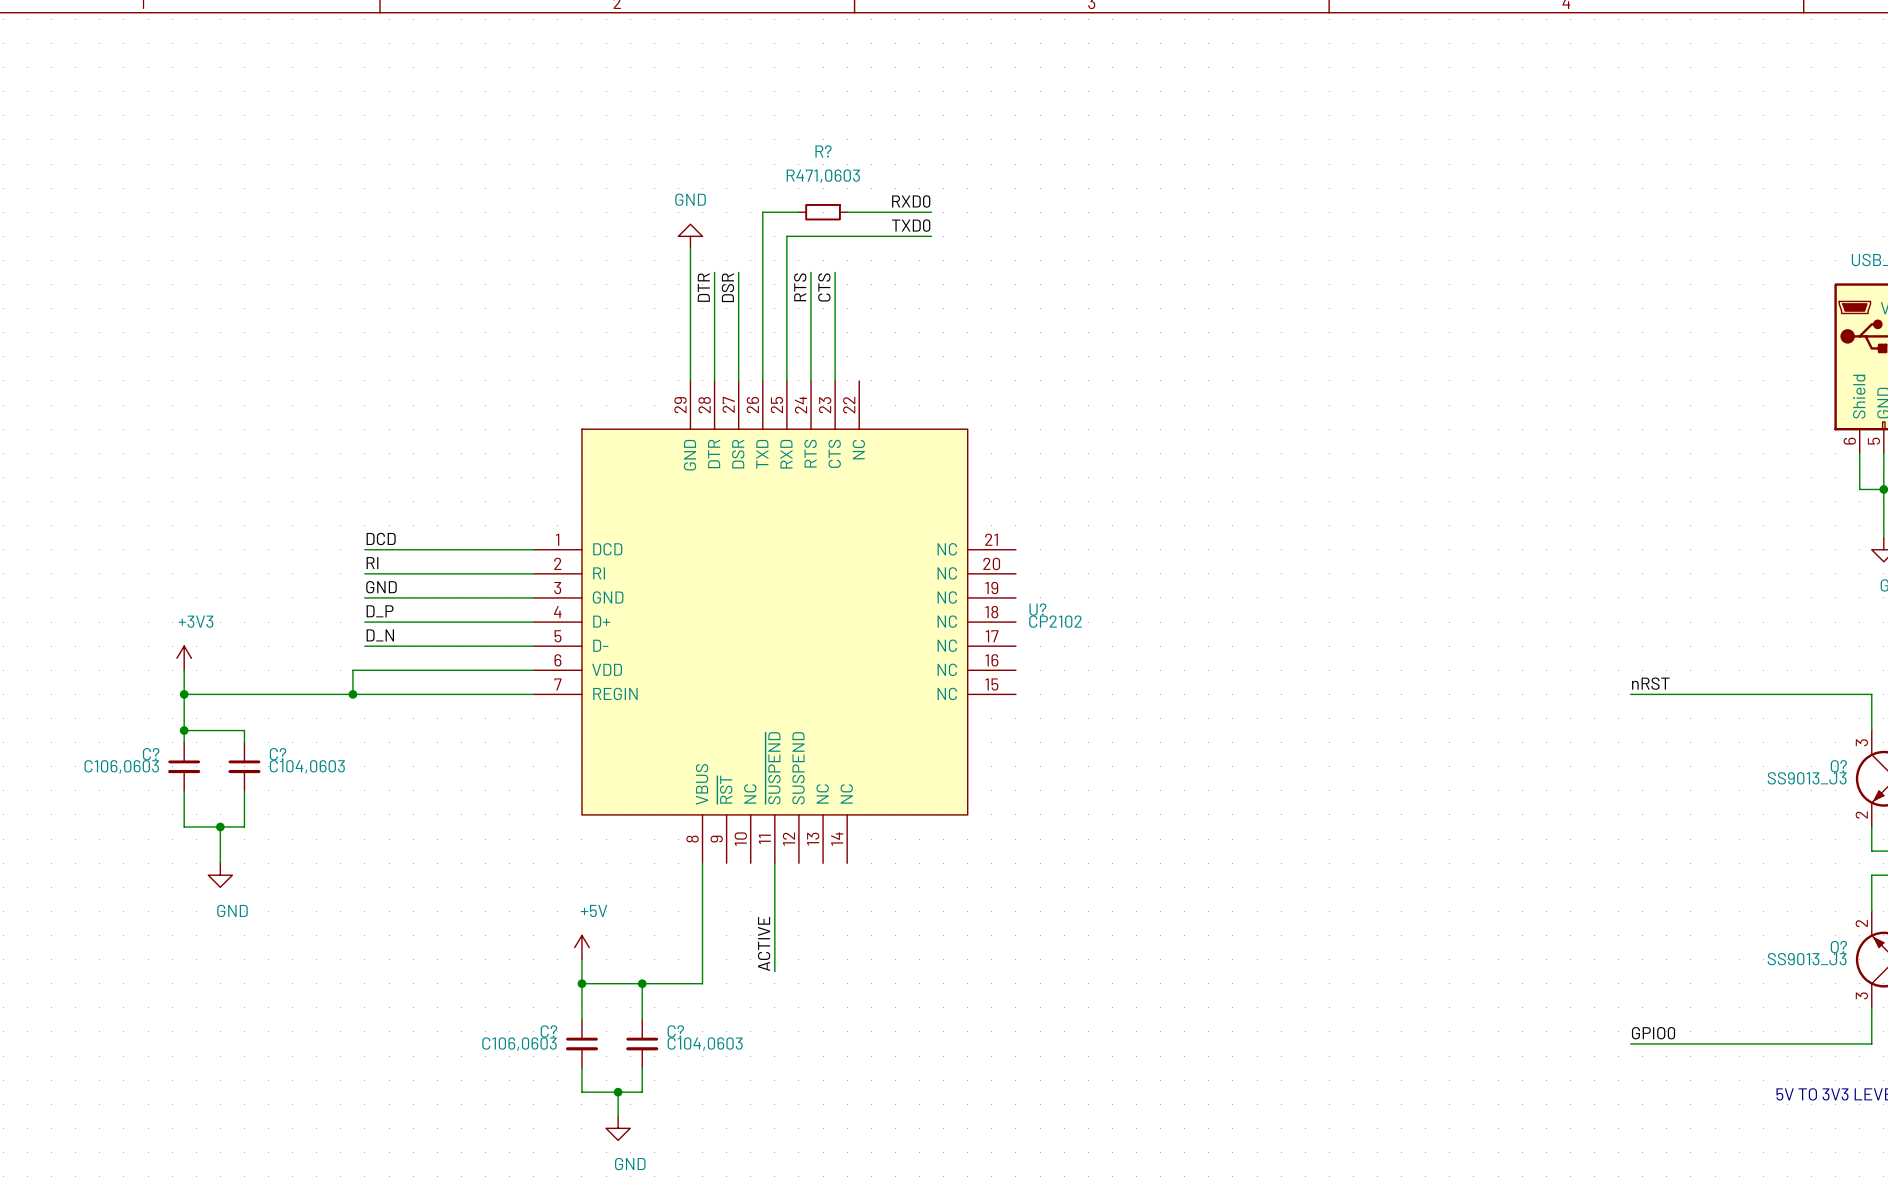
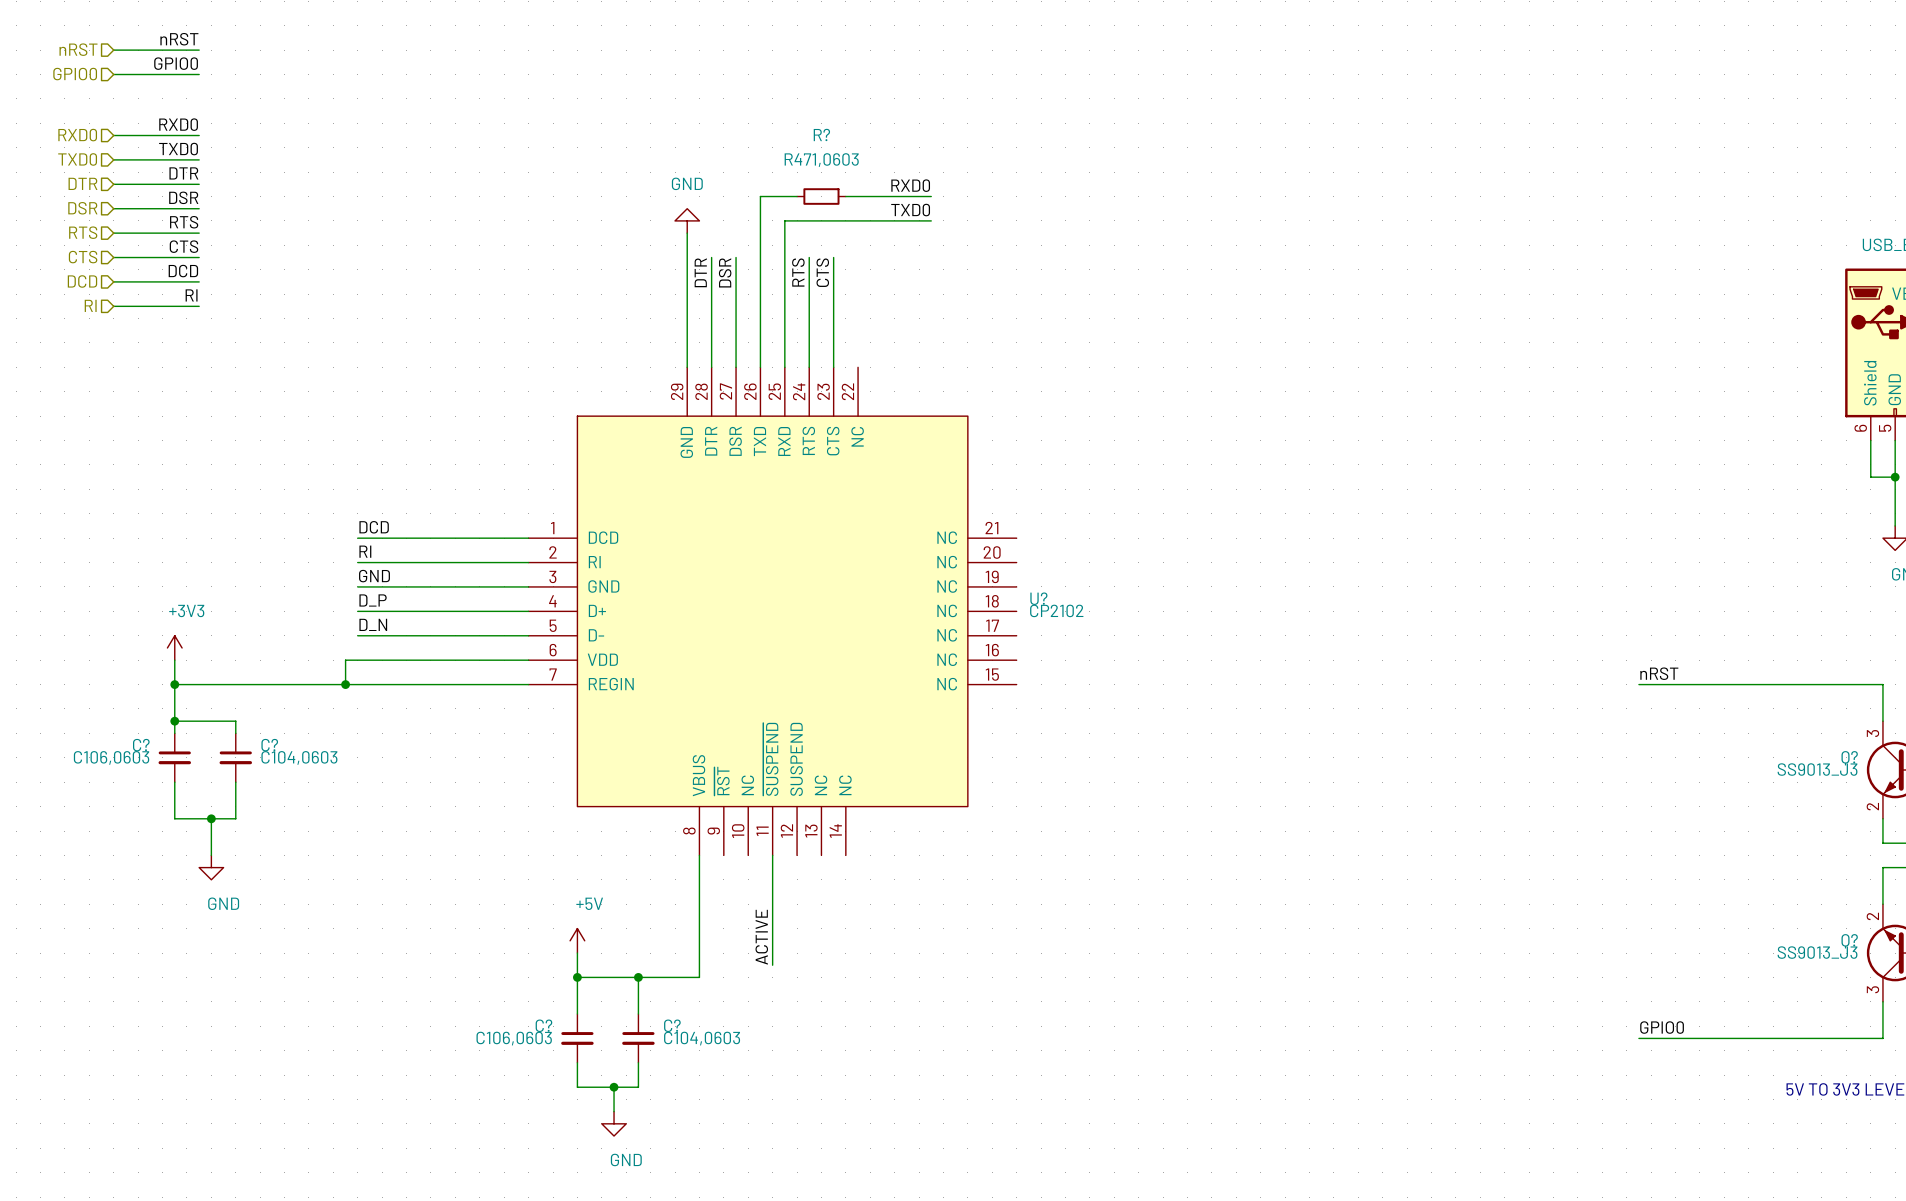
label: none -> nRST (179, 39)
hierarchical label: none -> nRST (78, 49)
wire: none -> (113, 50) (199, 50)
label: none -> GPIO0 (176, 63)
hierarchical label: none -> GPIO0 (75, 74)
wire: none -> (113, 74) (199, 74)
label: none -> RXD0 (178, 124)
hierarchical label: none -> RXD0 (77, 135)
wire: none -> (113, 135) (199, 135)
label: none -> TXD0 (178, 149)
hierarchical label: none -> TXD0 (77, 159)
wire: none -> (113, 159) (199, 159)
label: none -> DTR (183, 173)
hierarchical label: none -> DTR (82, 183)
wire: none -> (113, 184) (199, 184)
label: none -> DSR (183, 197)
hierarchical label: none -> DSR (82, 208)
wire: none -> (113, 208) (199, 208)
label: none -> RTS (184, 222)
hierarchical label: none -> RTS (83, 232)
wire: none -> (113, 233) (199, 233)
label: none -> CTS (183, 246)
hierarchical label: none -> CTS (83, 257)
wire: none -> (113, 257) (199, 257)
label: none -> DCD (183, 271)
hierarchical label: none -> DCD (82, 281)
wire: none -> (113, 281) (199, 281)
label: none -> RI (191, 295)
hierarchical label: none -> RI (90, 305)
wire: none -> (113, 306) (199, 306)

